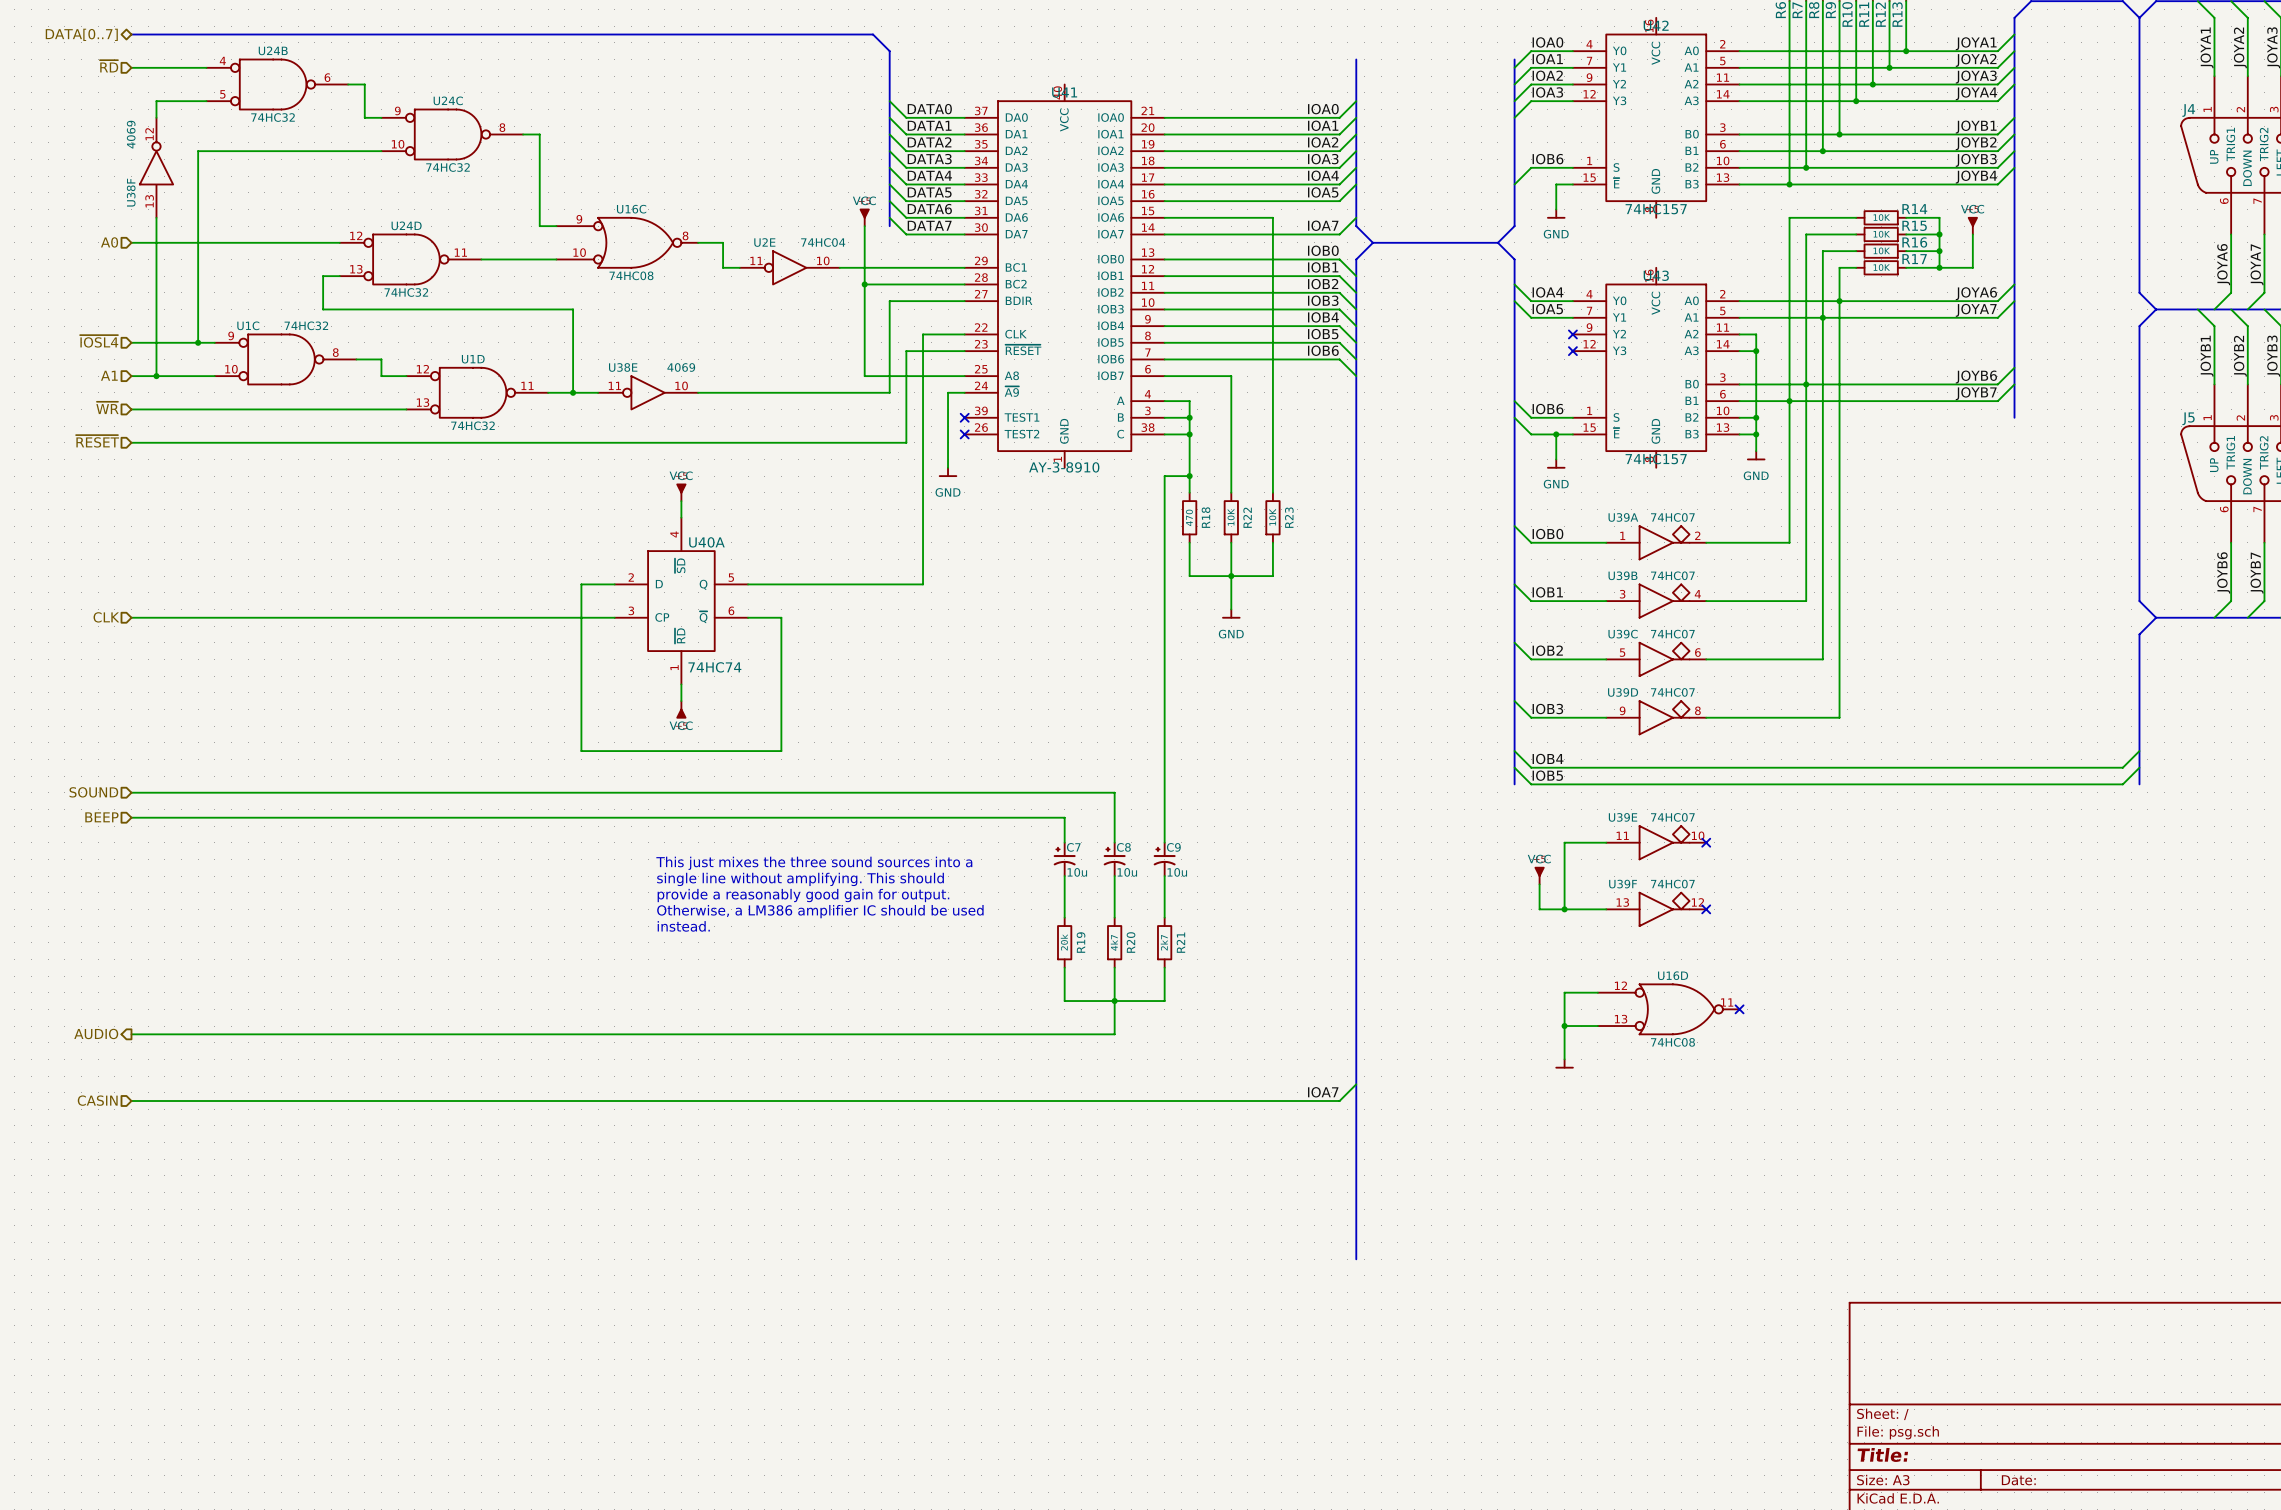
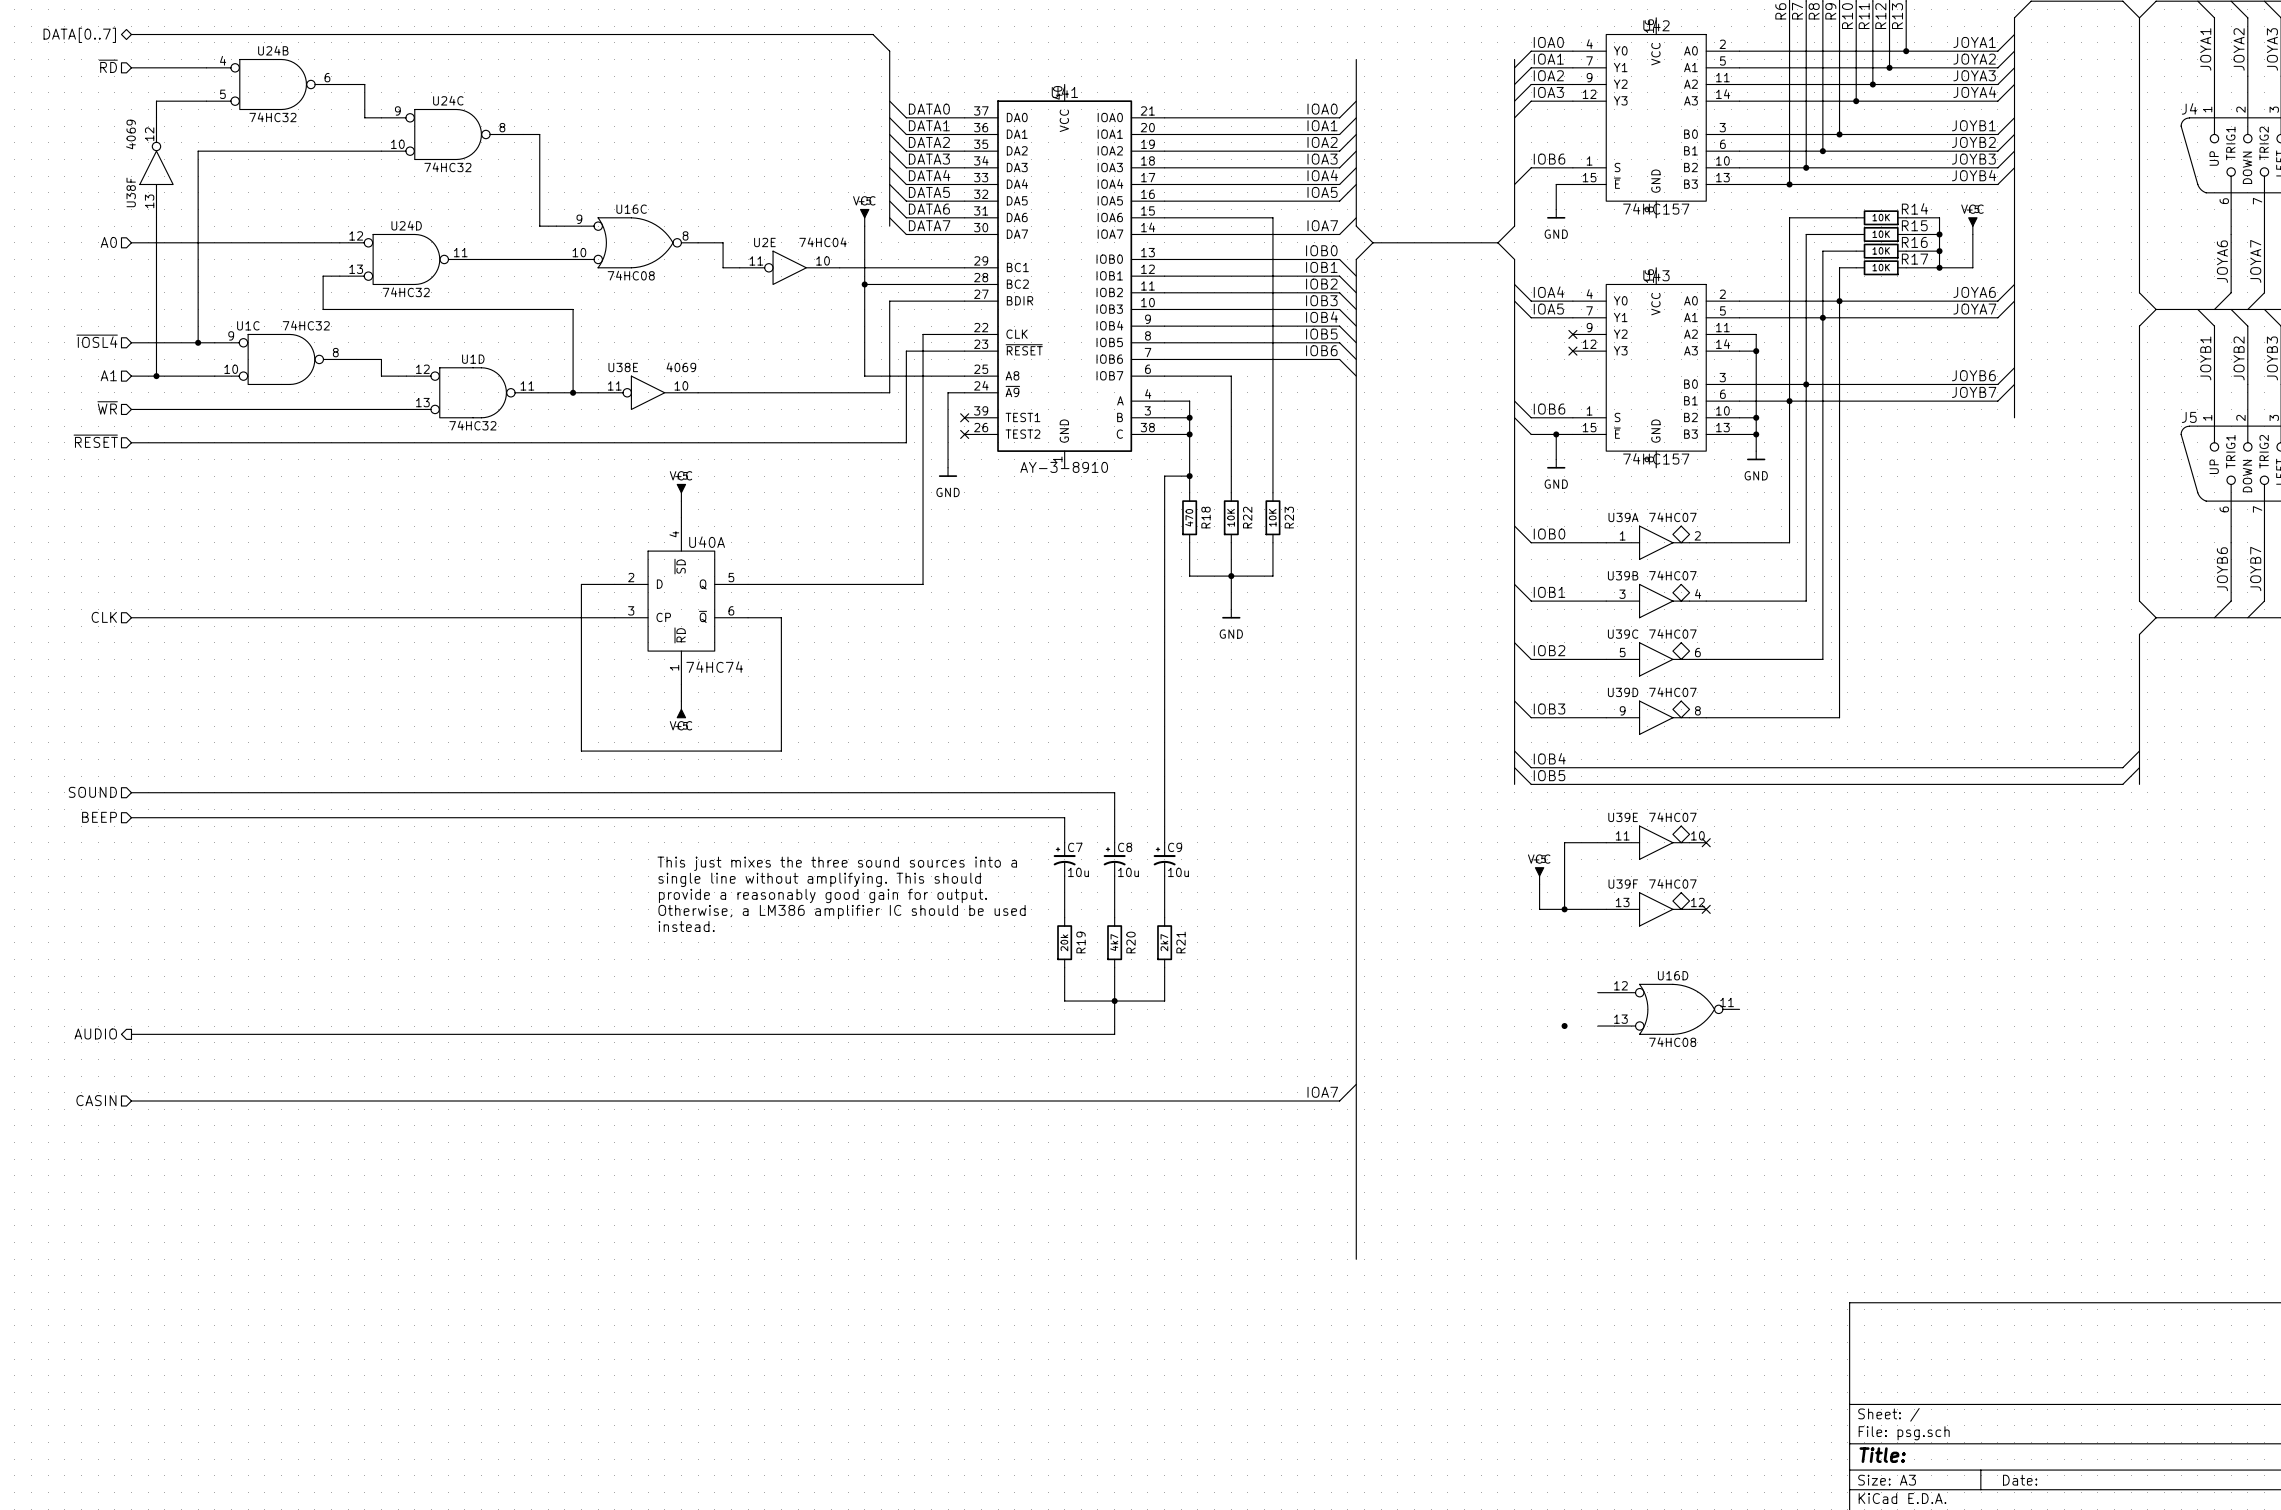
wire: (1597, 992) (1564, 992) (1564, 1059) -> none
no-connect mark: (1739, 1009) -> none
wire: (1564, 1026) (1597, 1026) -> none
power symbol: (1564, 1063) -> none

